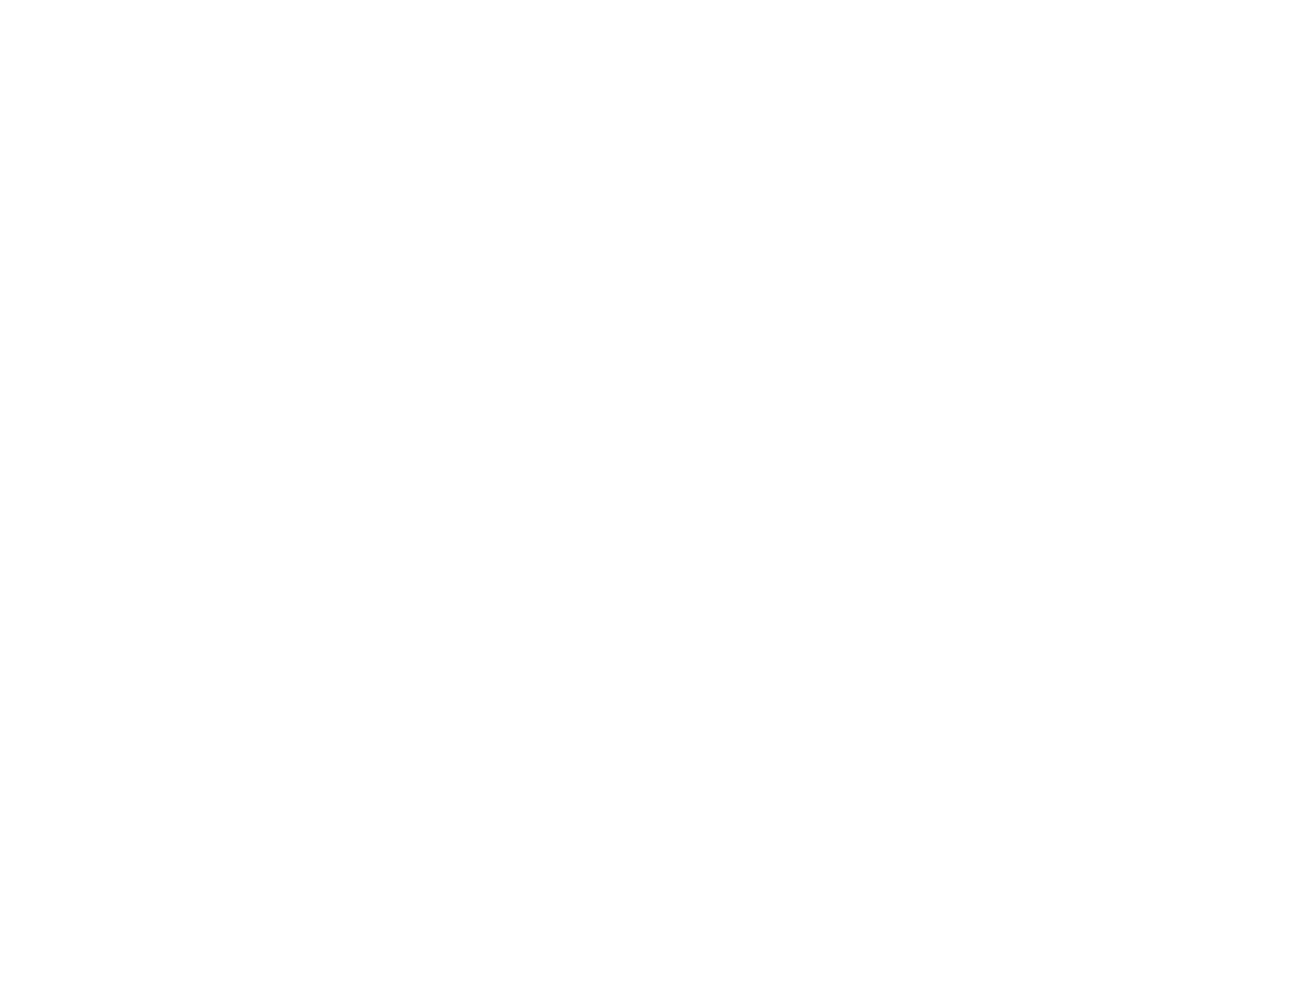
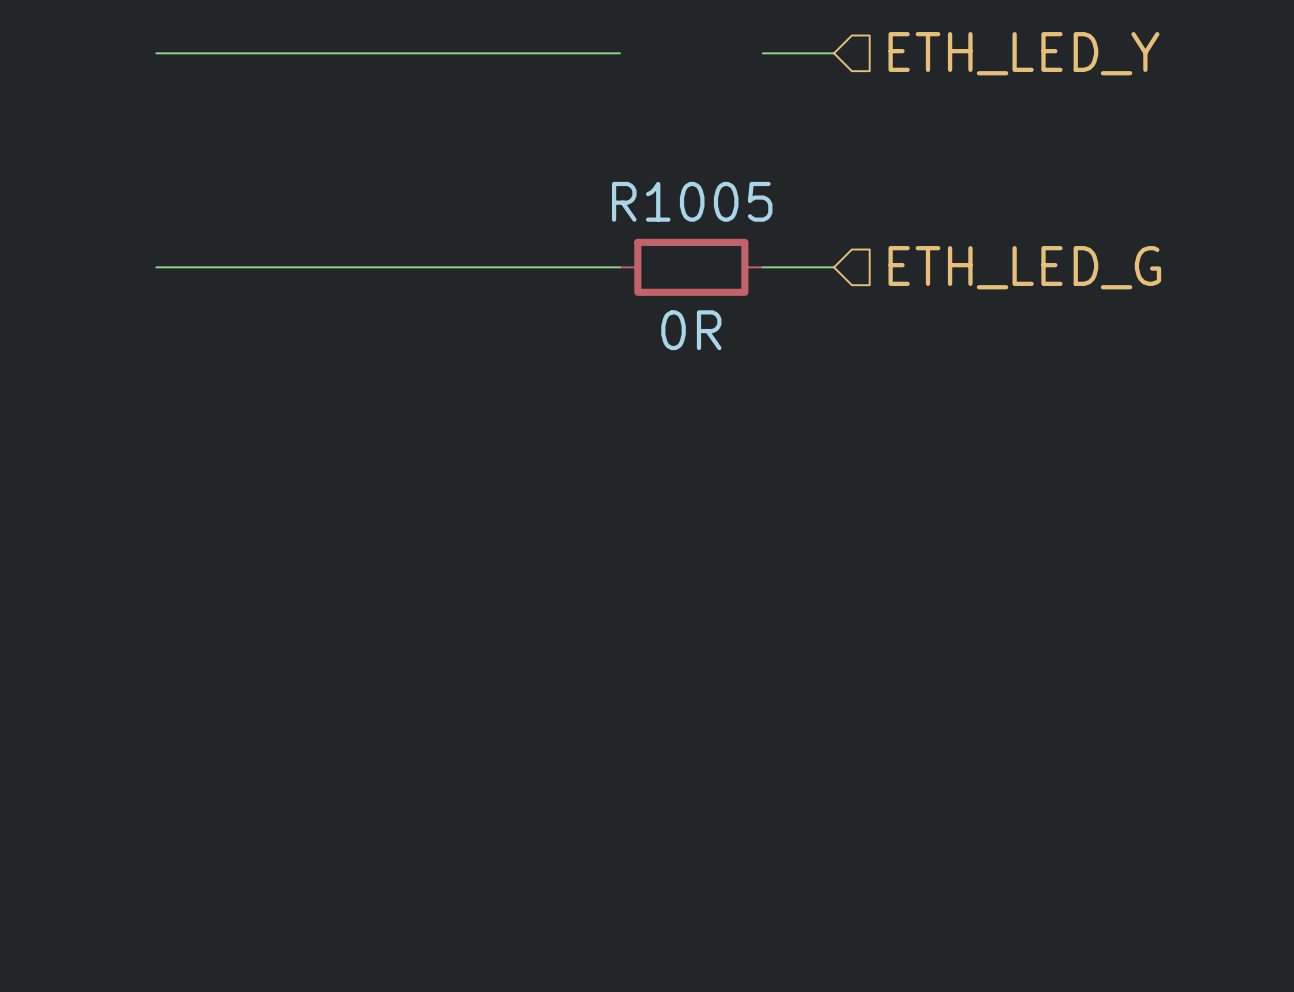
wire: none -> (156, 53) (620, 53)
wire: none -> (762, 53) (834, 53)
hierarchical label: none -> ETH_LED_Y (1023, 53)
wire: none -> (156, 267) (620, 267)
R1005: none -> (691, 267)
wire: none -> (762, 267) (834, 267)
hierarchical label: none -> ETH_LED_G (1024, 267)

